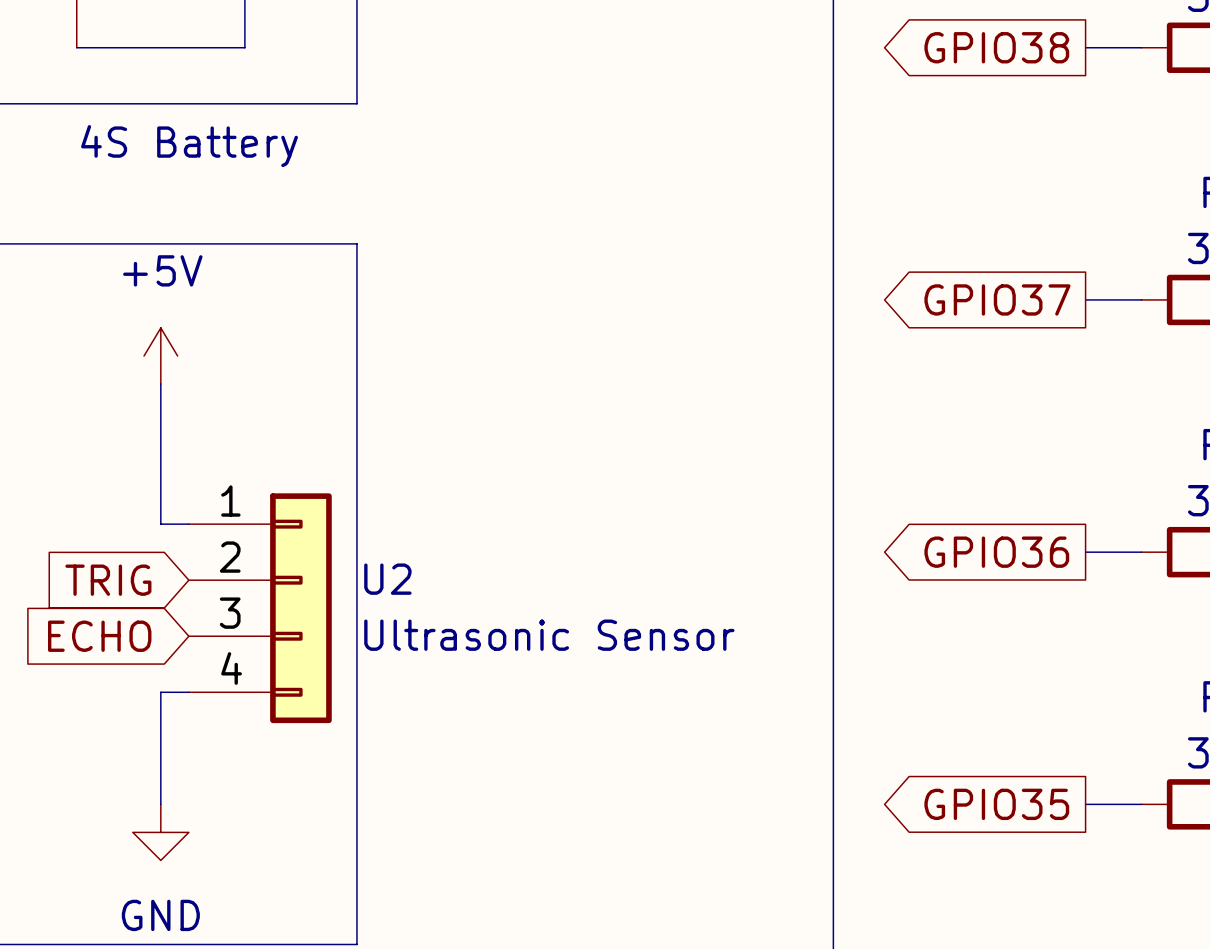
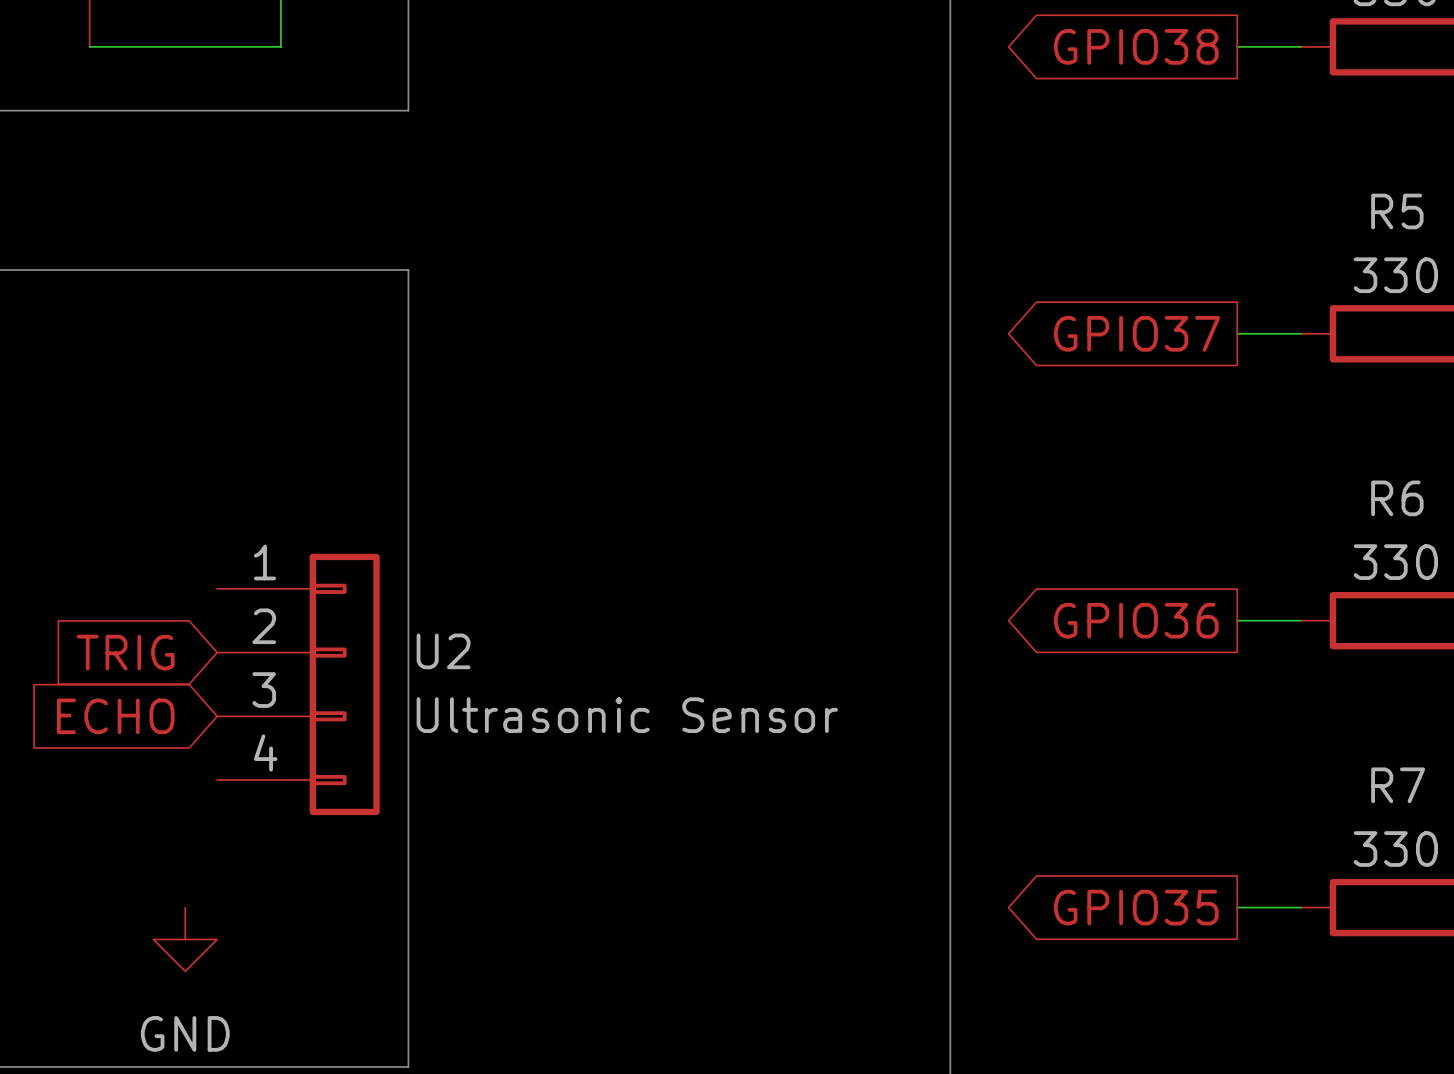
text: 4S Battery (189, 146) -> none
power symbol: +5V (160, 356) -> none
wire: (160, 384) (160, 524) (188, 524) -> none
wire: (188, 692) (160, 692) (160, 804) -> none

